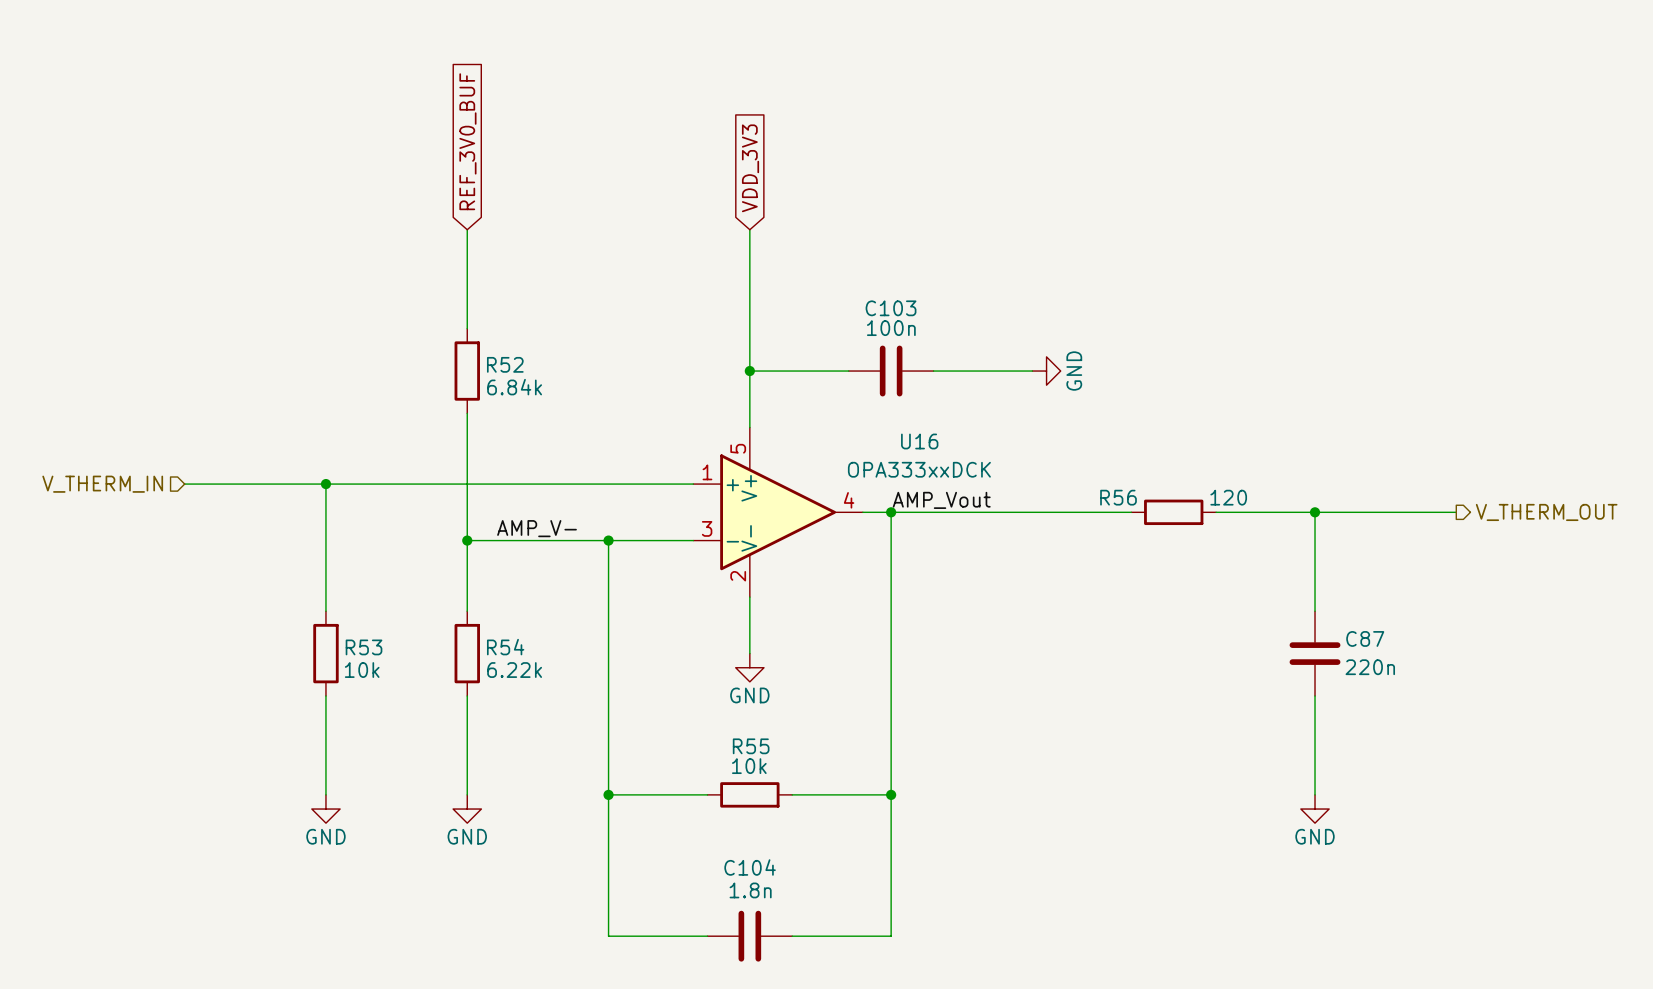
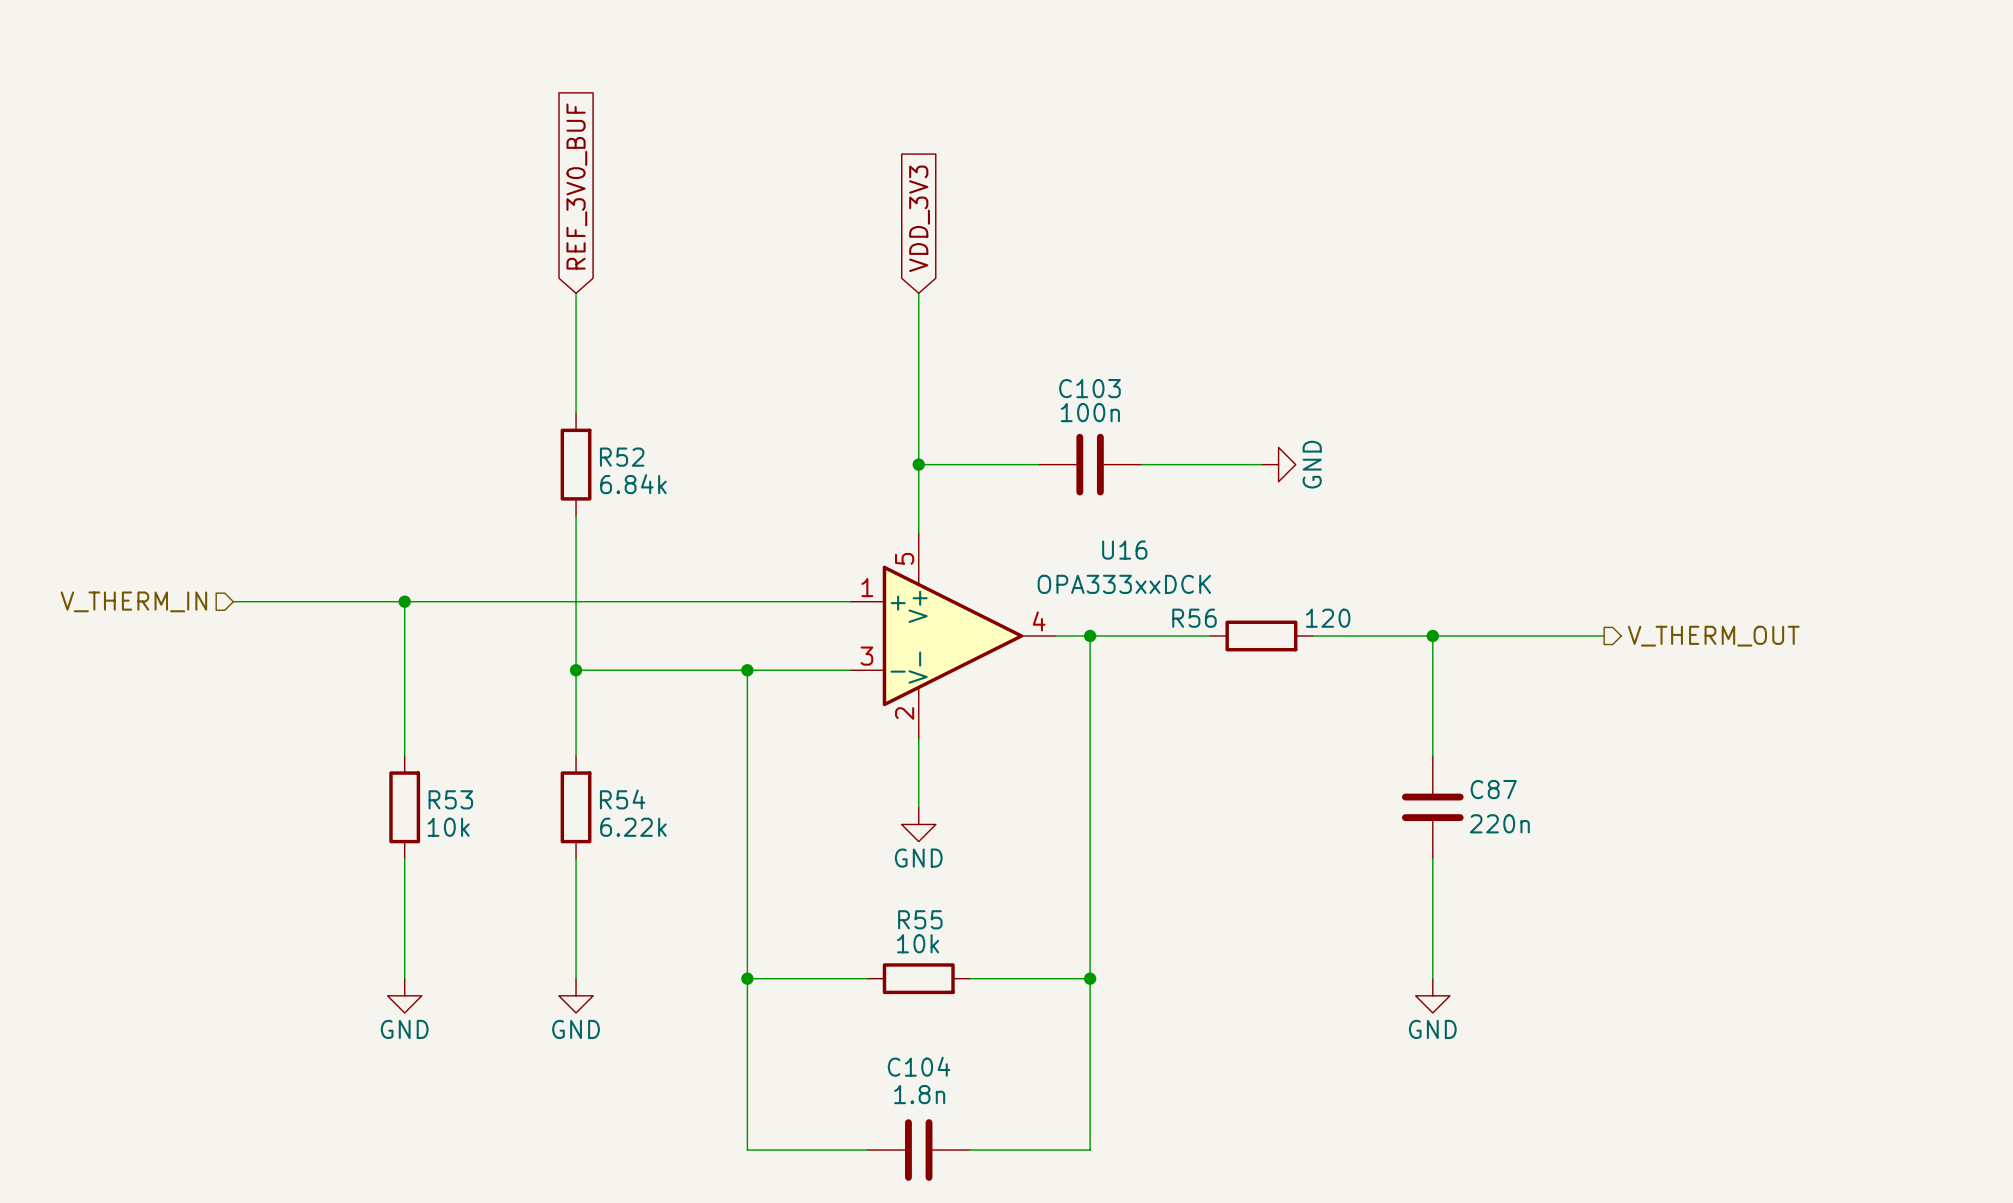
label: AMP_Vout (941, 500) -> none
wire: (990, 512) (1074, 512) -> (1381, 635) (1484, 635)
wire: none -> (1432, 635) (1432, 755)
junction: none -> (1432, 635)
R56 position: (1173, 512) -> (1261, 635)
junction: (1315, 512) -> none
wire: (1456, 512) (1315, 512) (1315, 611) -> none
hierarchical label position: V_THERM_OUT (1546, 512) -> V_THERM_OUT (1713, 636)
label: AMP_V- (537, 528) -> none
C87 position: (1315, 653) -> (1432, 807)
wire: (1315, 695) (1315, 794) -> (1432, 858) (1432, 978)
power symbol position: GND (1315, 809) -> GND (1432, 995)

